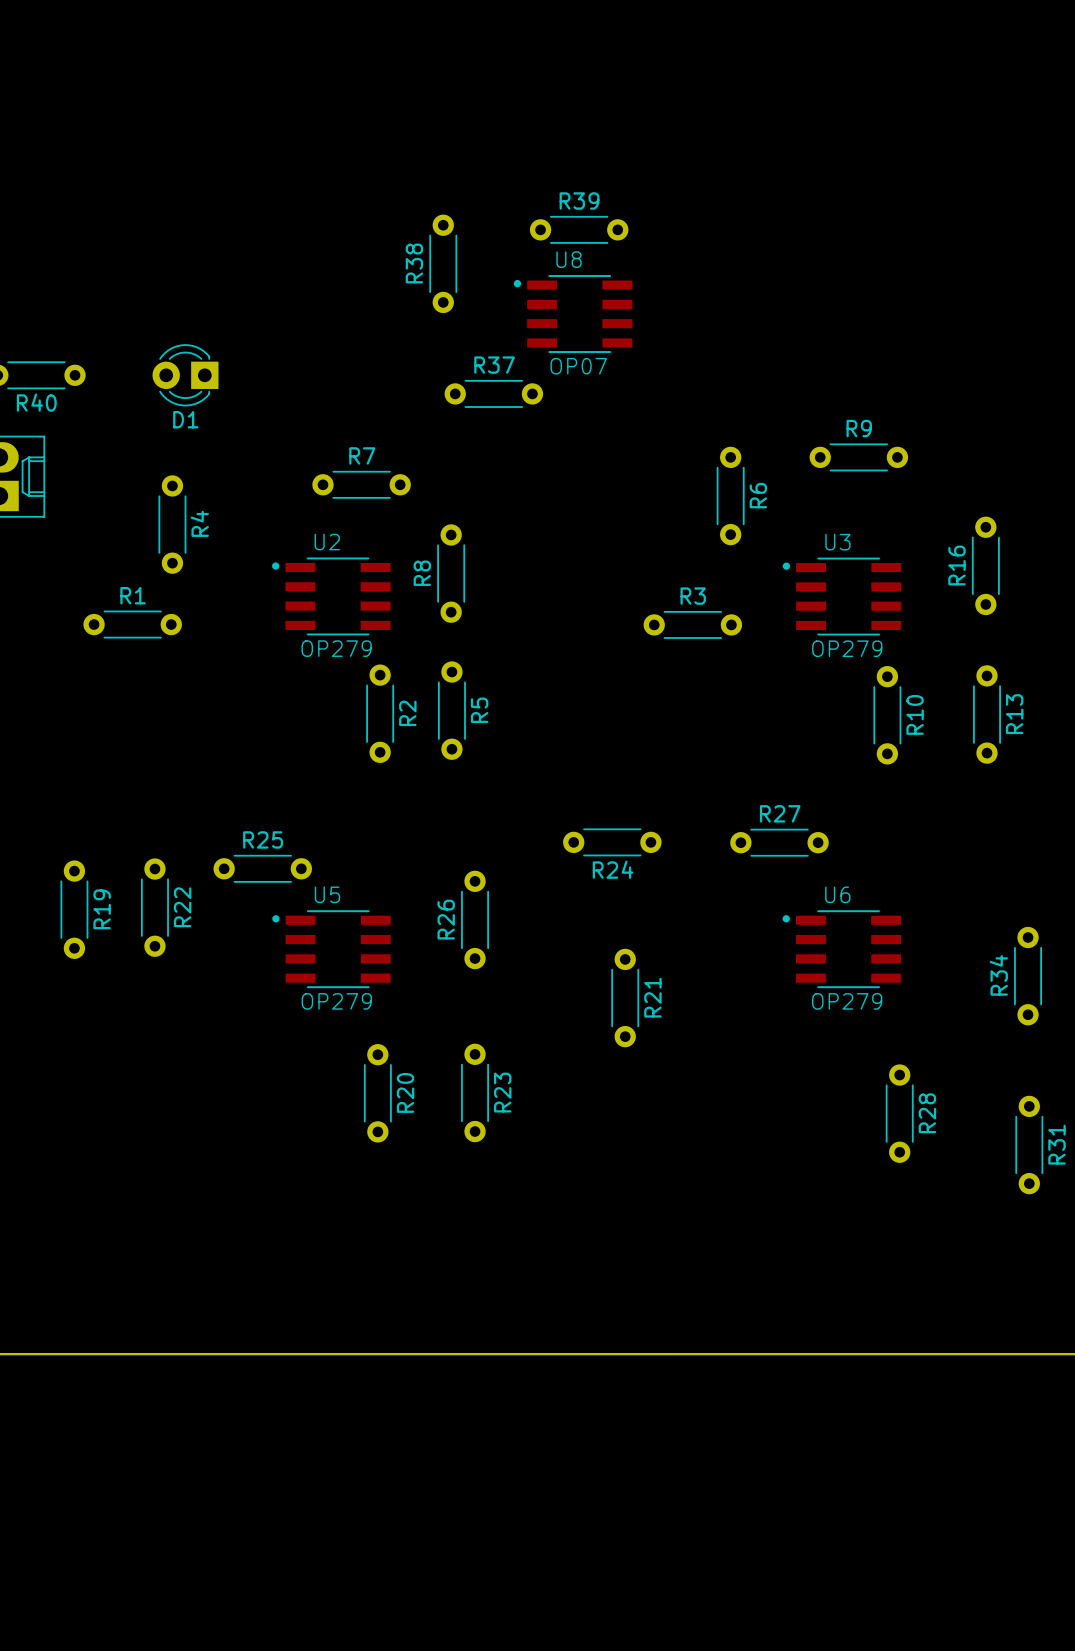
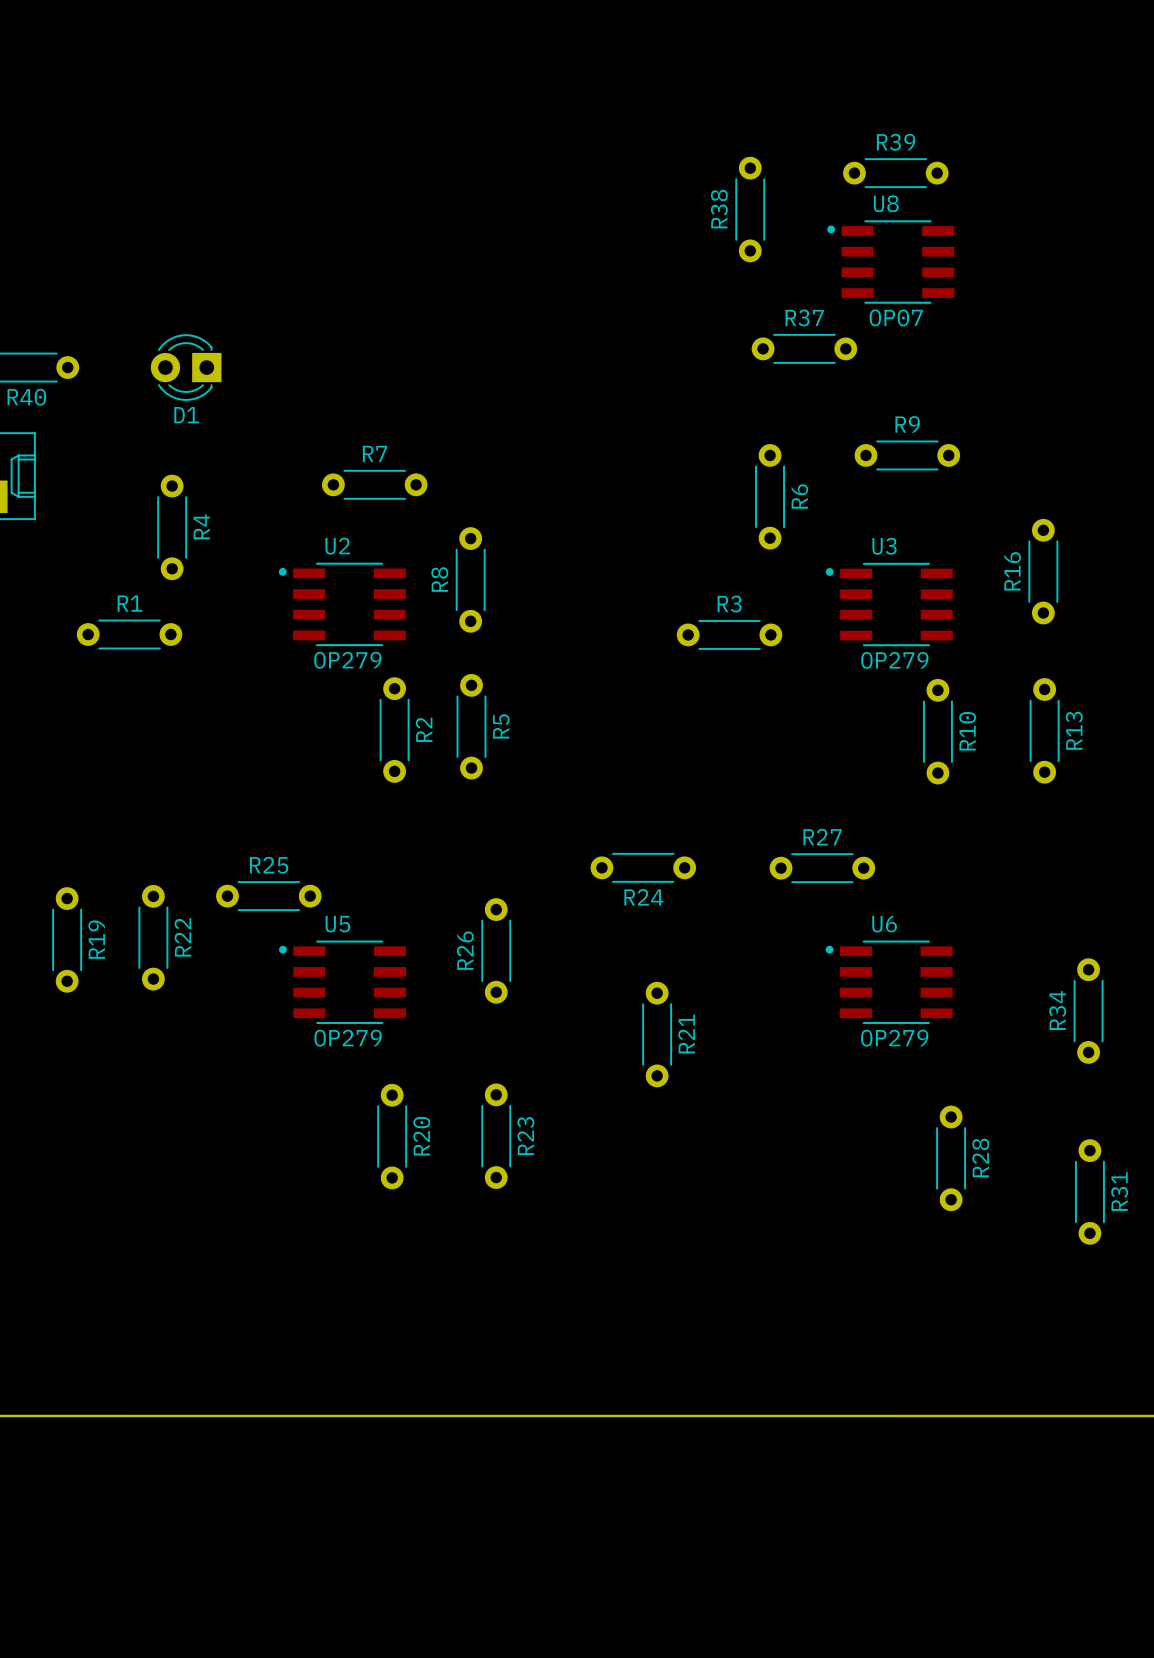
R39 position: (579, 229) -> (895, 173)
R38 position: (443, 263) -> (750, 209)
U8 position: (573, 314) -> (890, 262)
R37 position: (493, 393) -> (804, 348)

